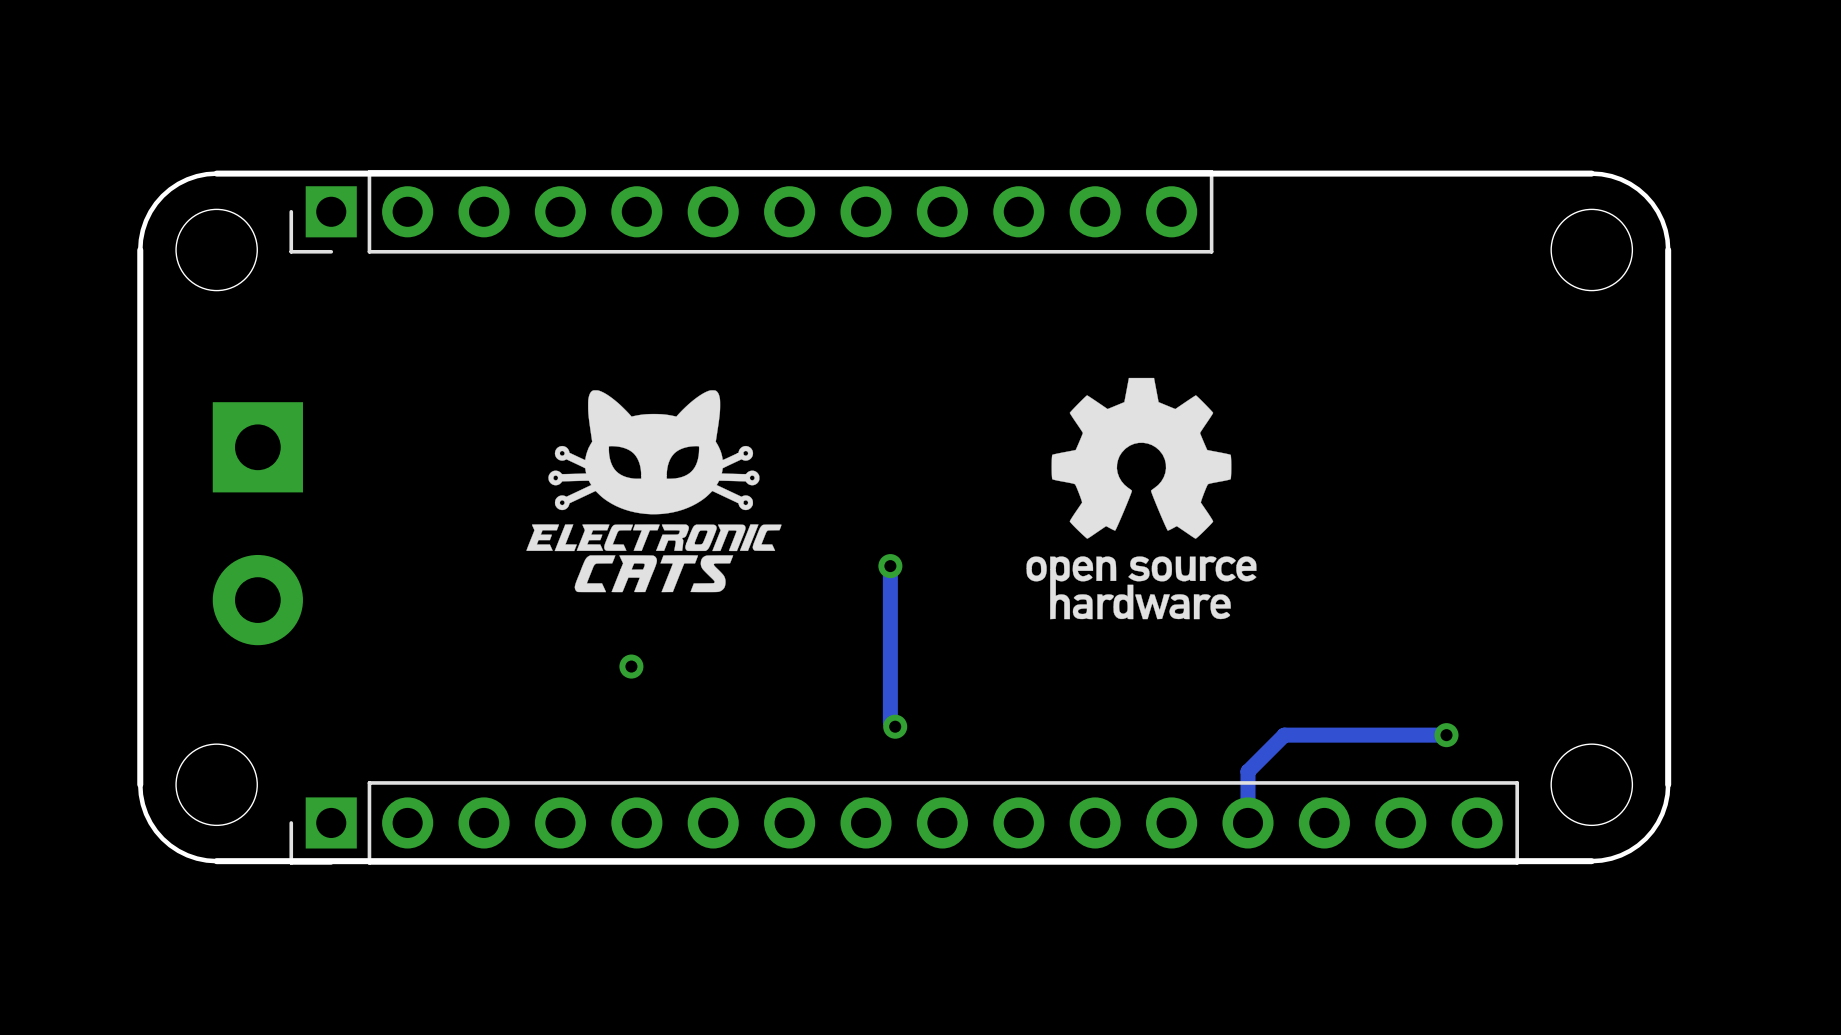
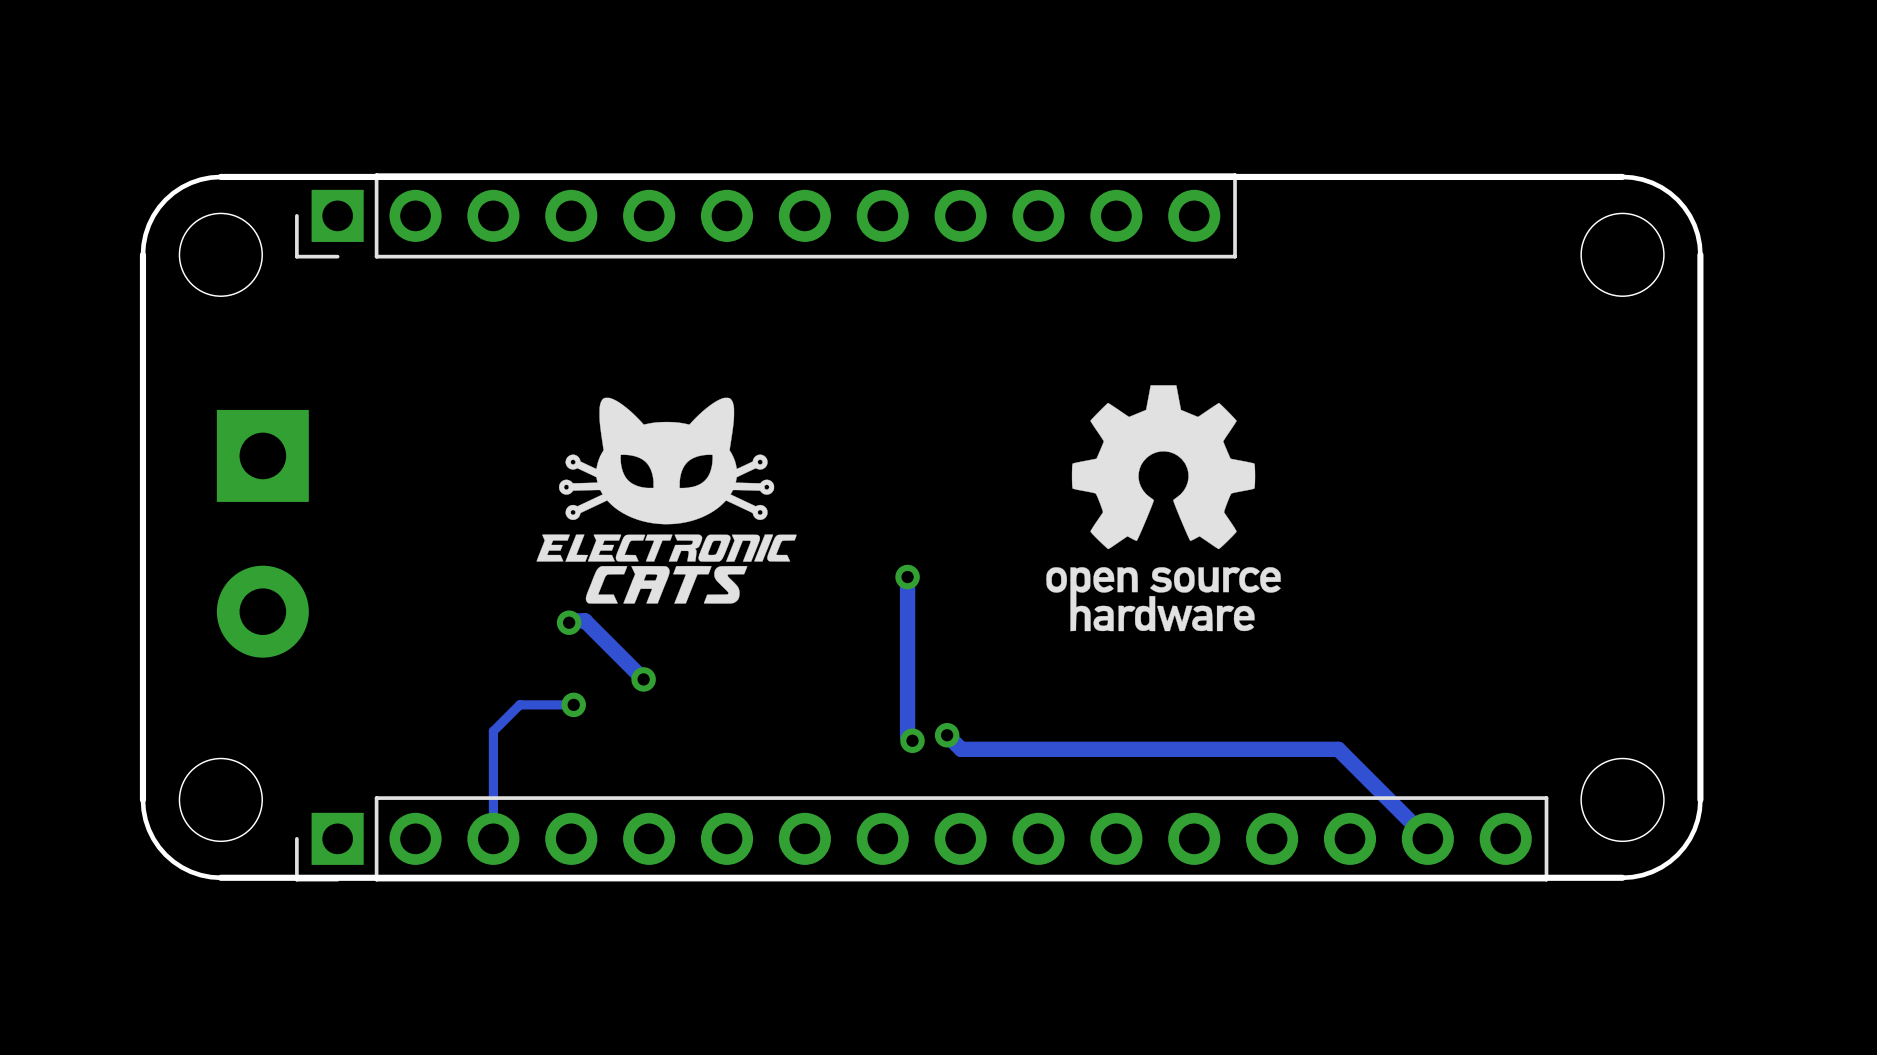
track: none -> (569, 622) (570, 620) (585, 620) (643, 679)
via: none -> (569, 622)
track: none -> (573, 704) (519, 704) (493, 731) (493, 838)
via: none -> (573, 704)
via: none -> (947, 735)
track: (1284, 735) (1247, 771) (1247, 822) -> (1309, 749) (961, 749) (947, 735)
track: (1446, 735) (1312, 735) -> (1427, 838) (1338, 749)
via: (1446, 735) -> none

